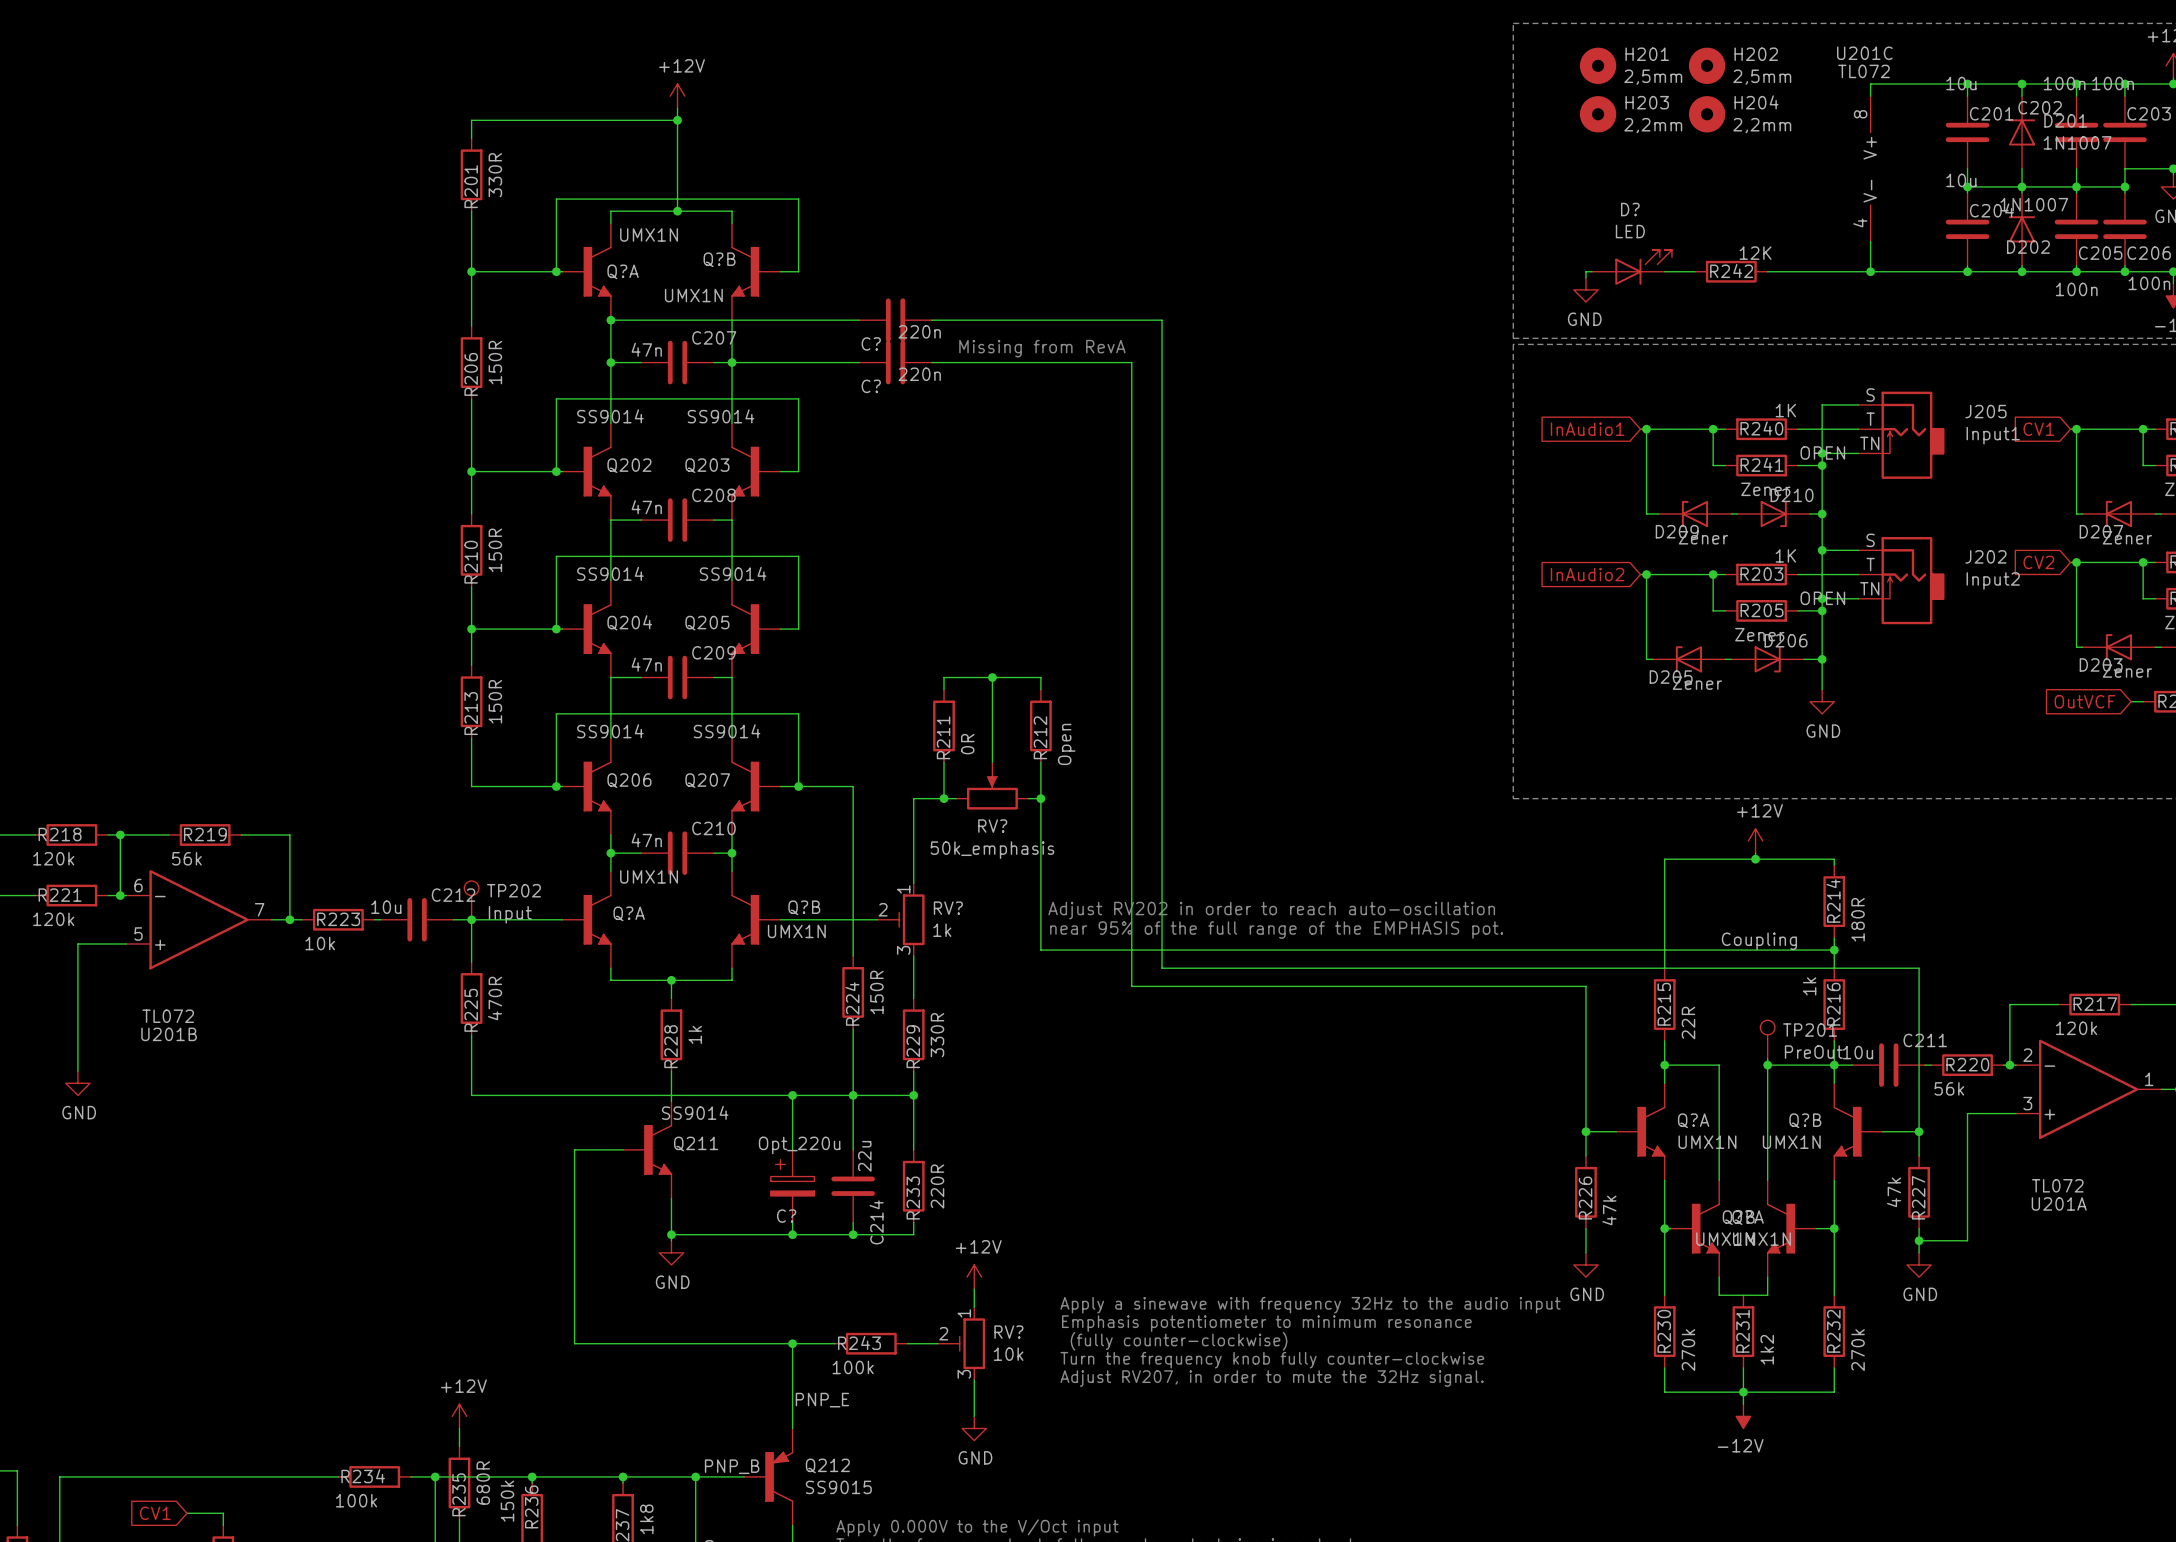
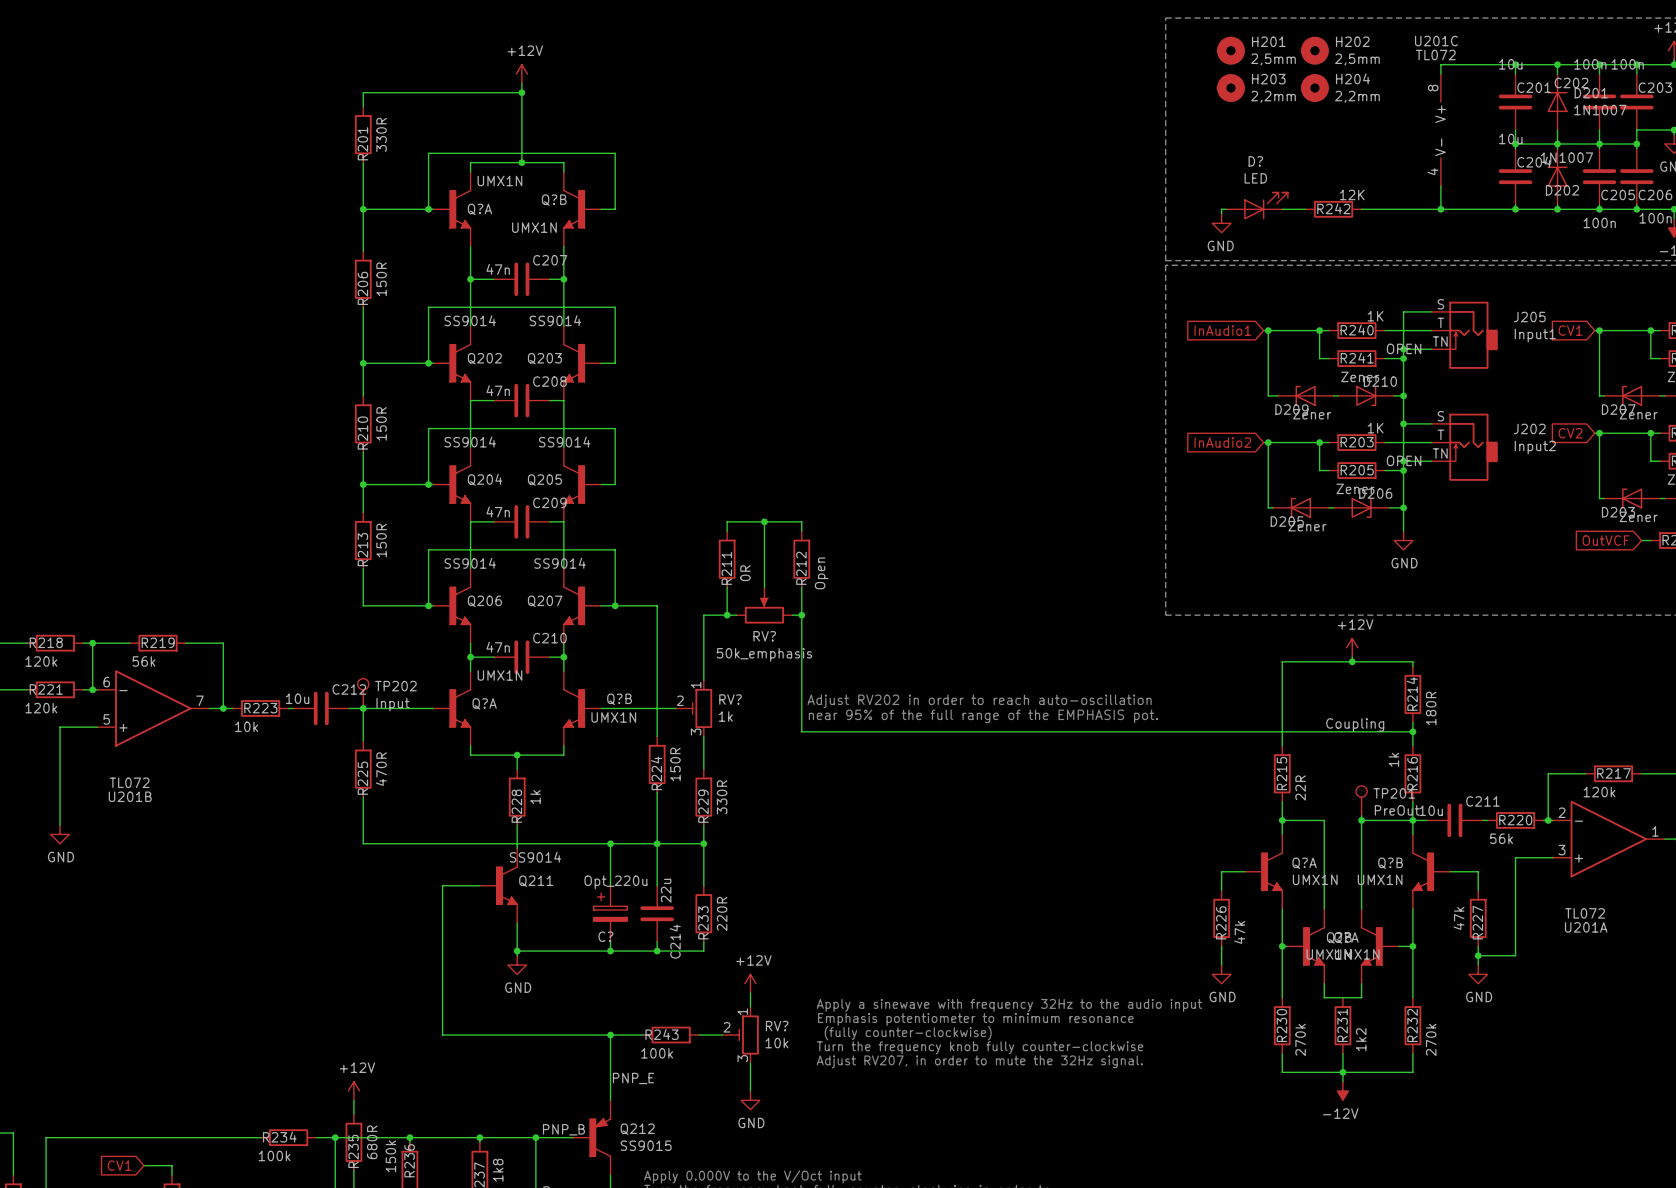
wire: (610, 320) (859, 320) -> none
junction: (610, 320) -> none
C?: 220n (895, 320) -> none
wire: (931, 320) (1162, 320) (1162, 968) (1919, 968) (1919, 1131) -> none
text: Missing from RevA (1042, 348) -> none
wire: (732, 362) (859, 362) -> none
C?: 220n (895, 362) -> none
wire: (931, 362) (1131, 362) (1131, 986) (1585, 986) (1585, 1131) -> none
junction: (1585, 1131) -> none
junction: (1919, 1131) -> none

